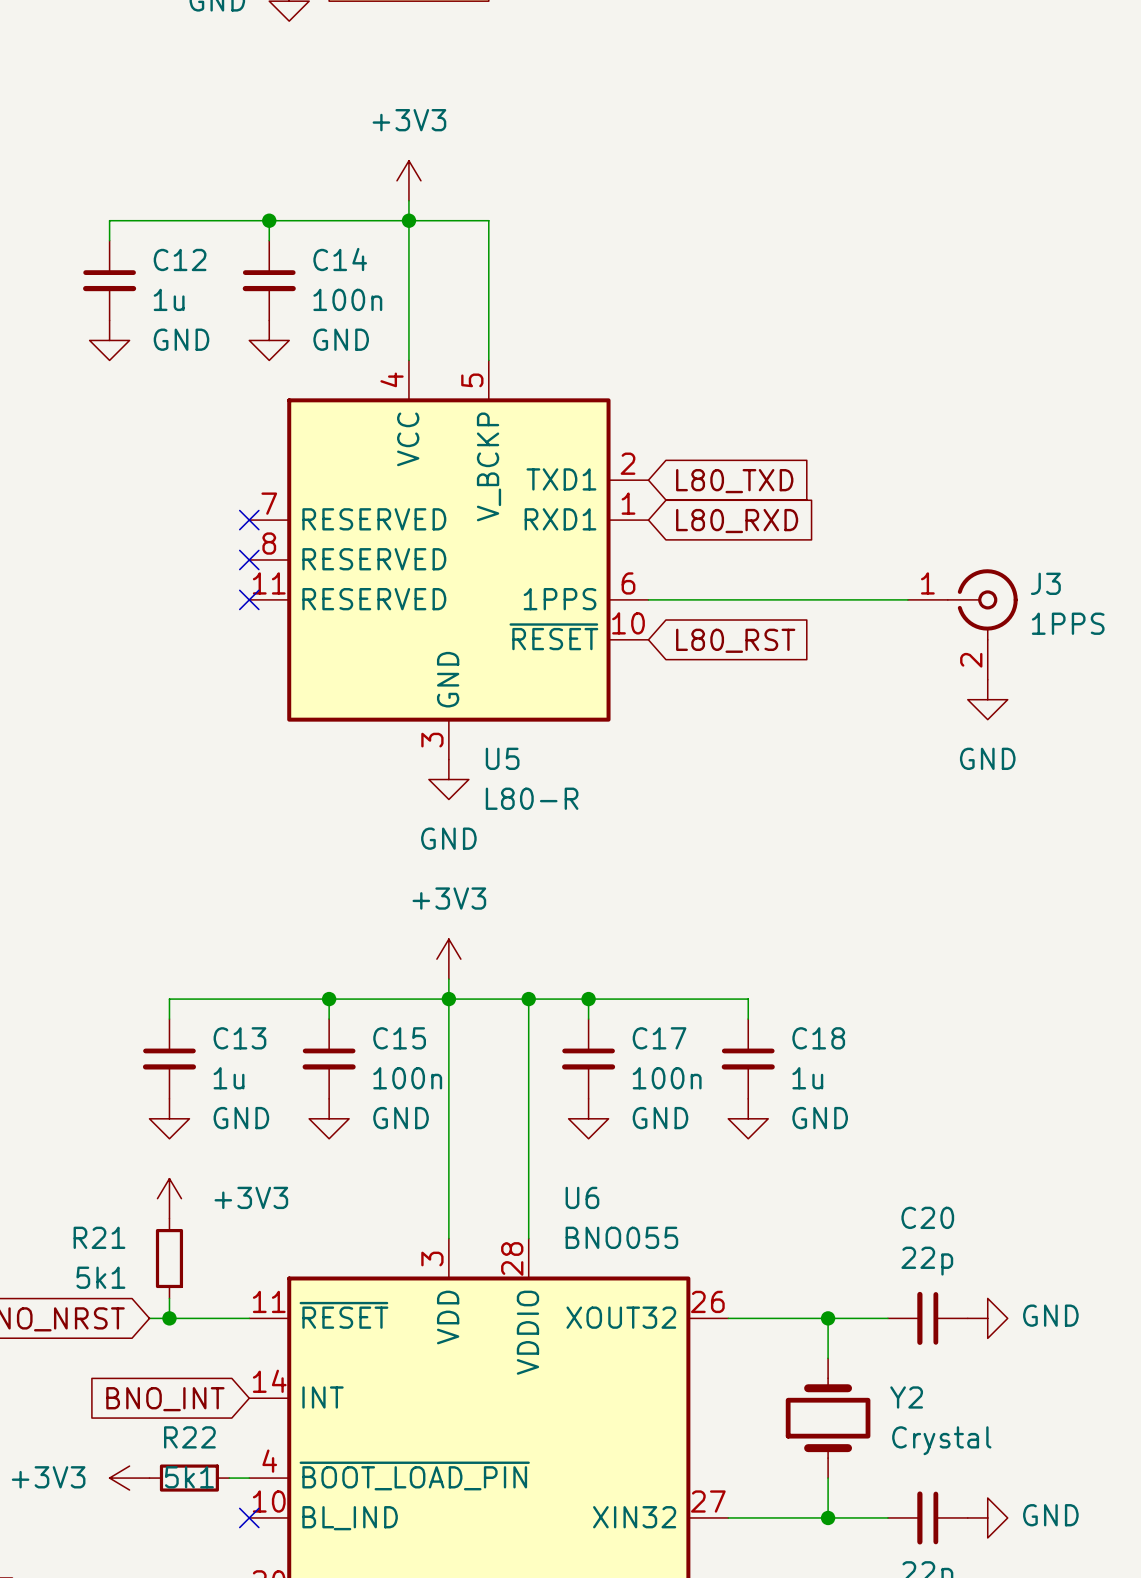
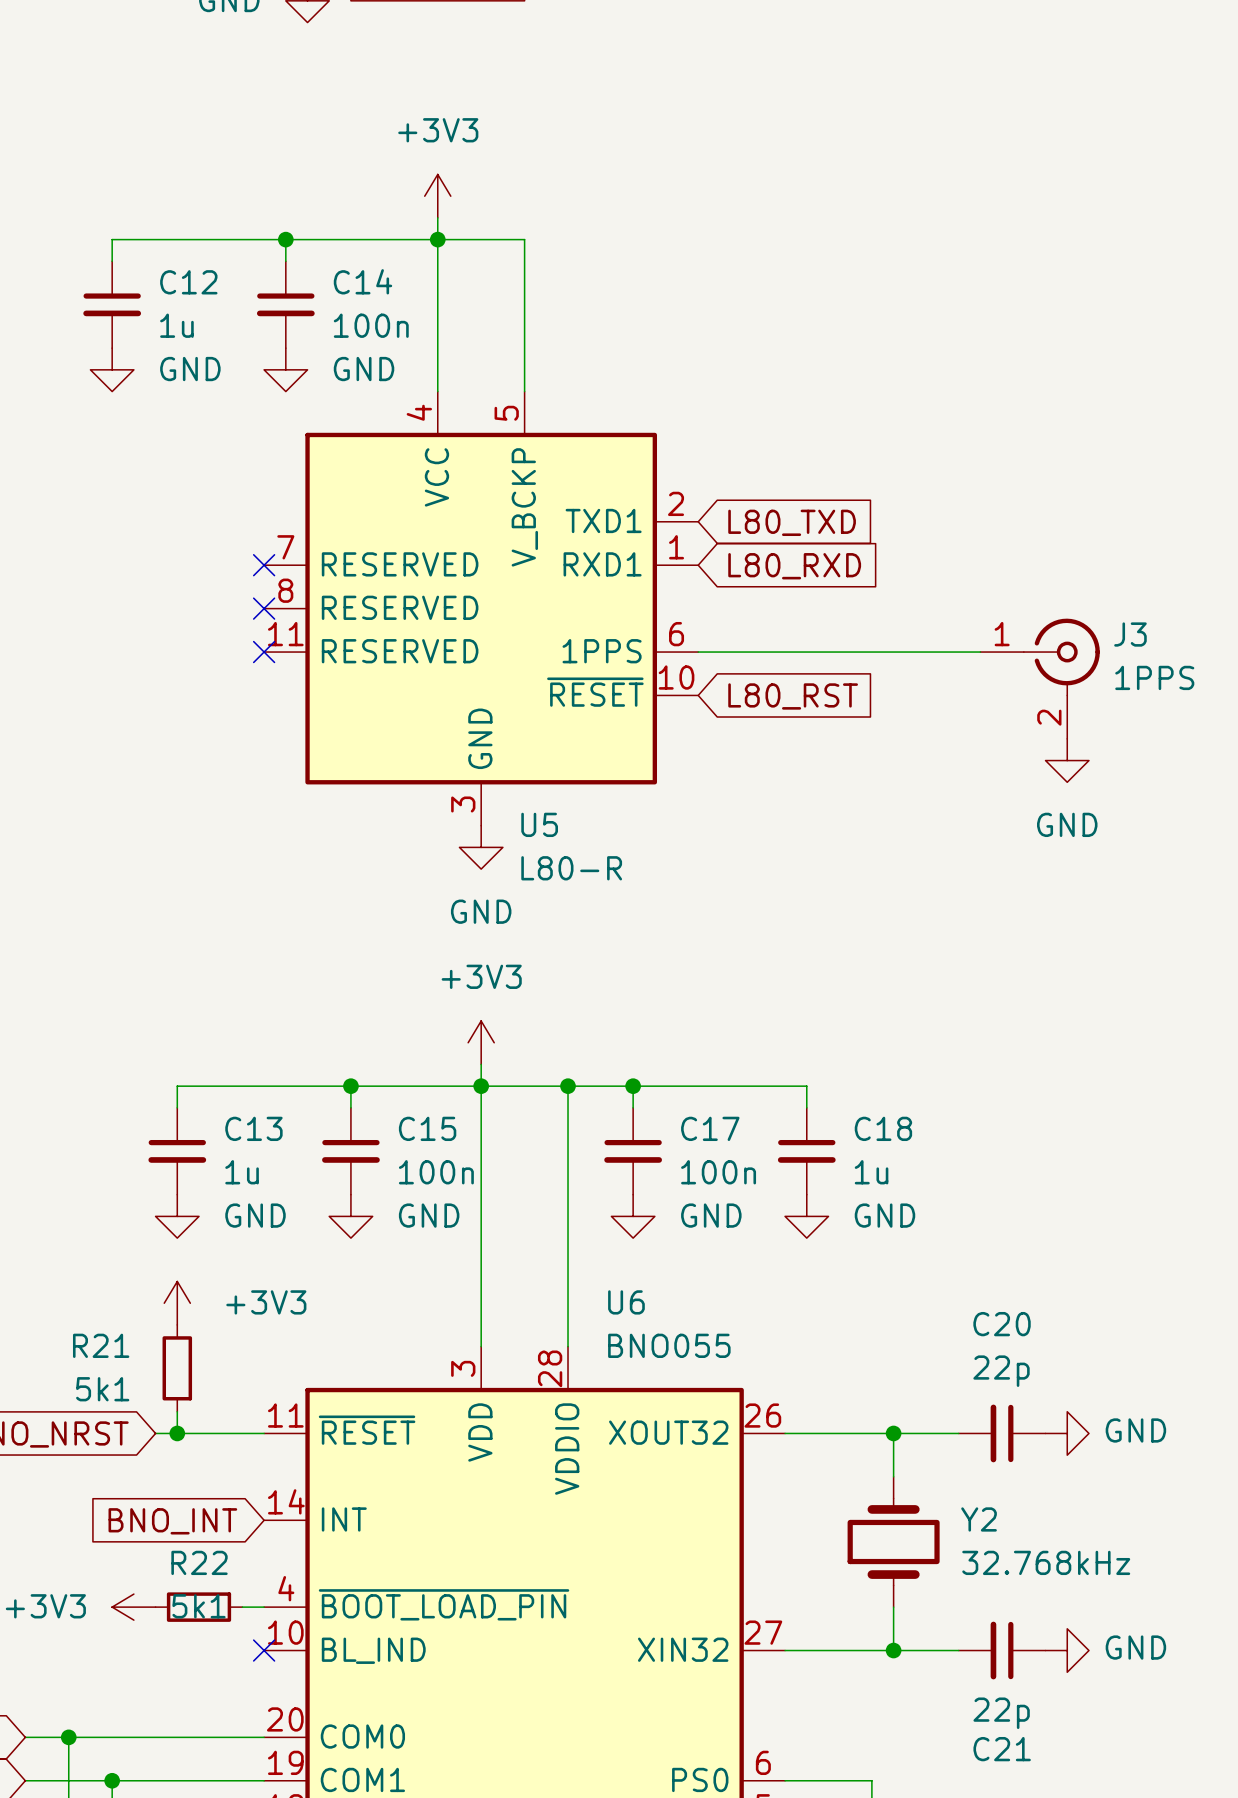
Y2 value: Crystal (941, 1440) -> 32.768kHz (1046, 1562)

